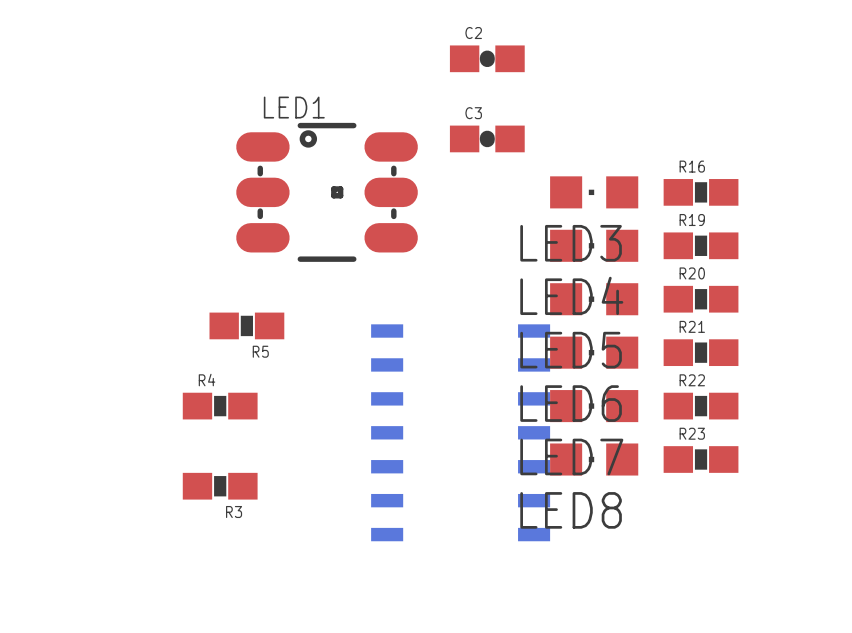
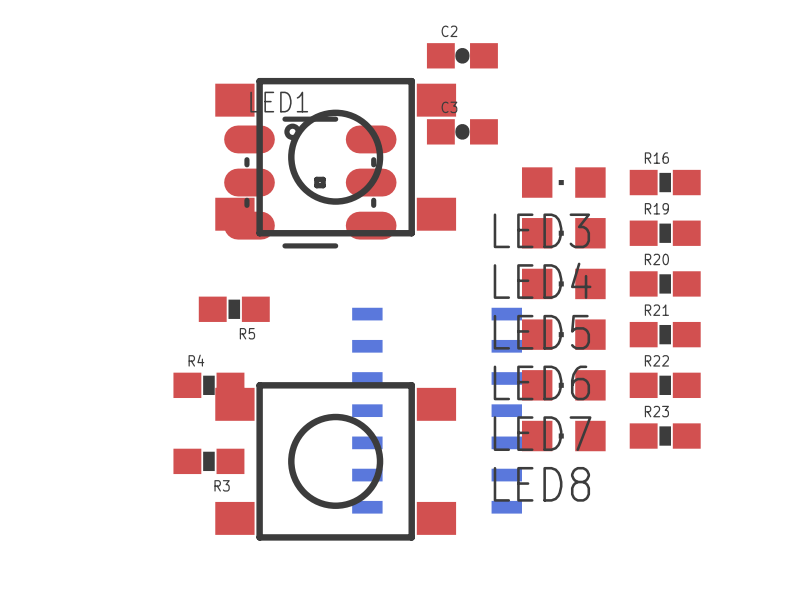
part: none -> (335, 157)
part: none -> (335, 461)

